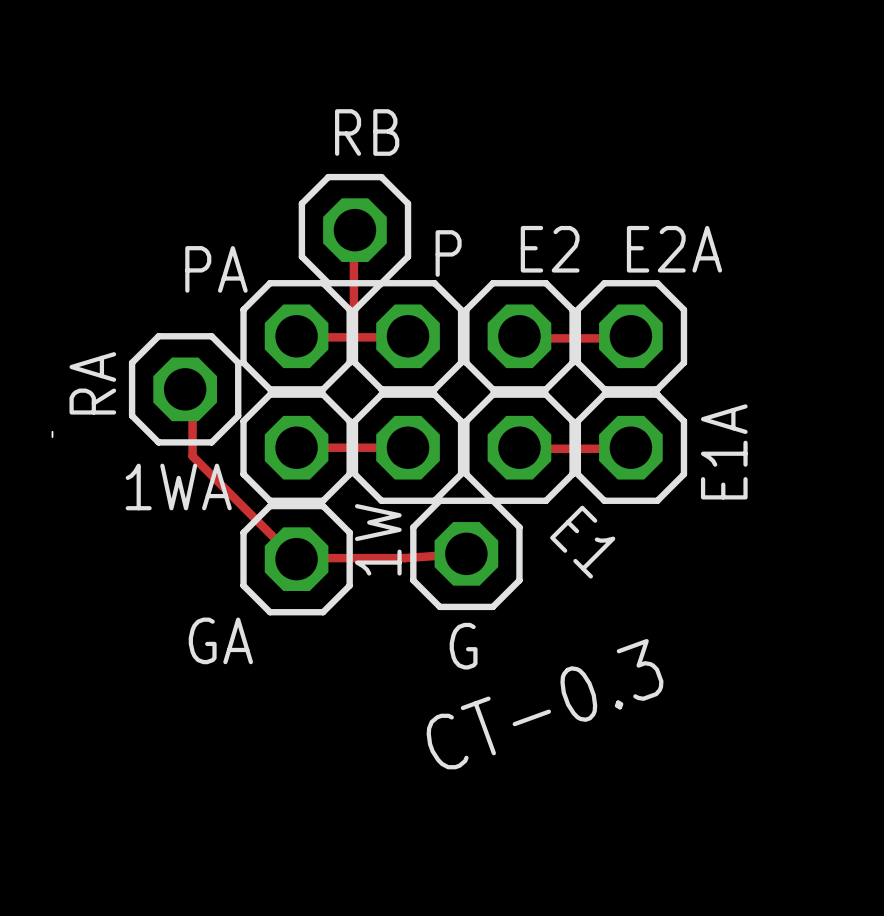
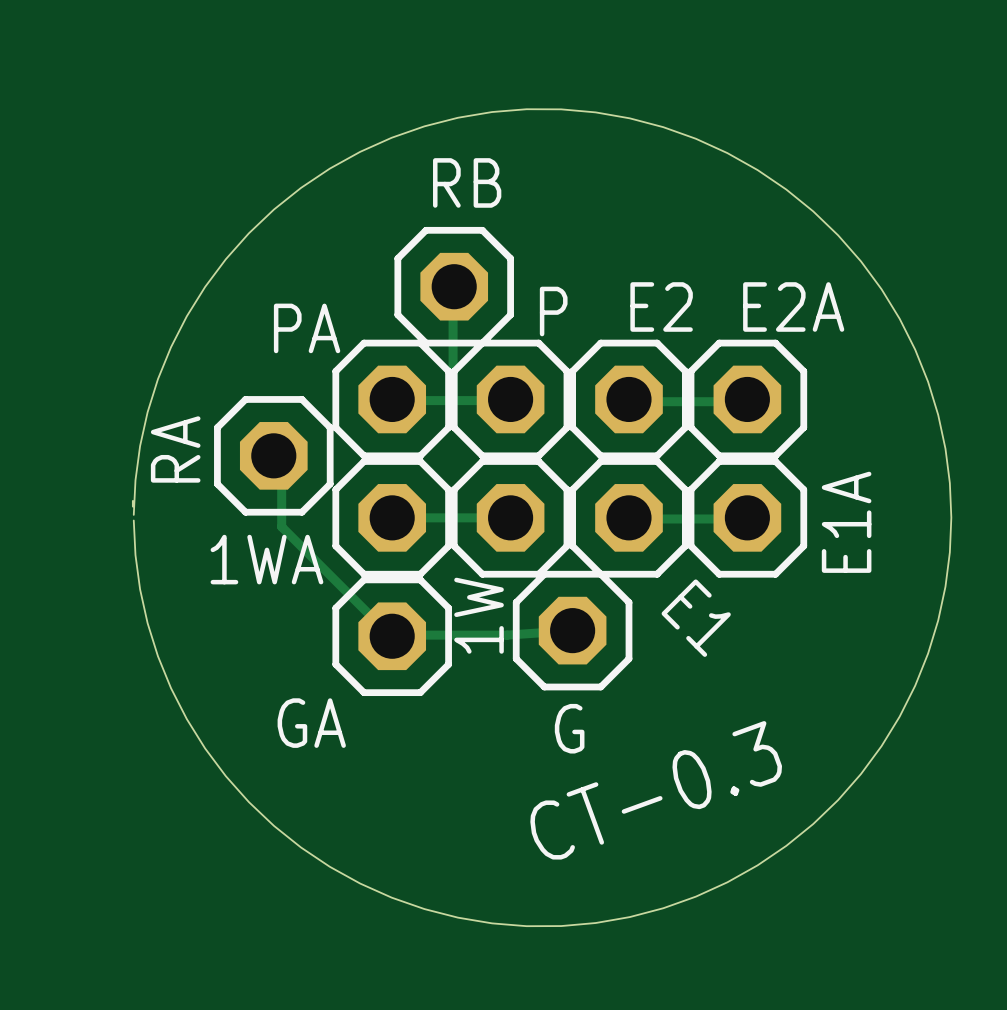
board edge: none -> (133, 514) (140, 445) (157, 379) (171, 347) (205, 286) (248, 233) (301, 187) (360, 151) (391, 137) (457, 117) (526, 109) (595, 112) (663, 127) (695, 138) (757, 170) (813, 211) (860, 261) (881, 289) (915, 349) (938, 414) (949, 483) (951, 517) (949, 552) (938, 620) (915, 685) (881, 746) (860, 774) (813, 824) (757, 865) (695, 896) (663, 908) (595, 923) (526, 926) (457, 917) (391, 897) (360, 883) (301, 847) (248, 802) (205, 748) (171, 688) (157, 656) (140, 589) (133, 520)

